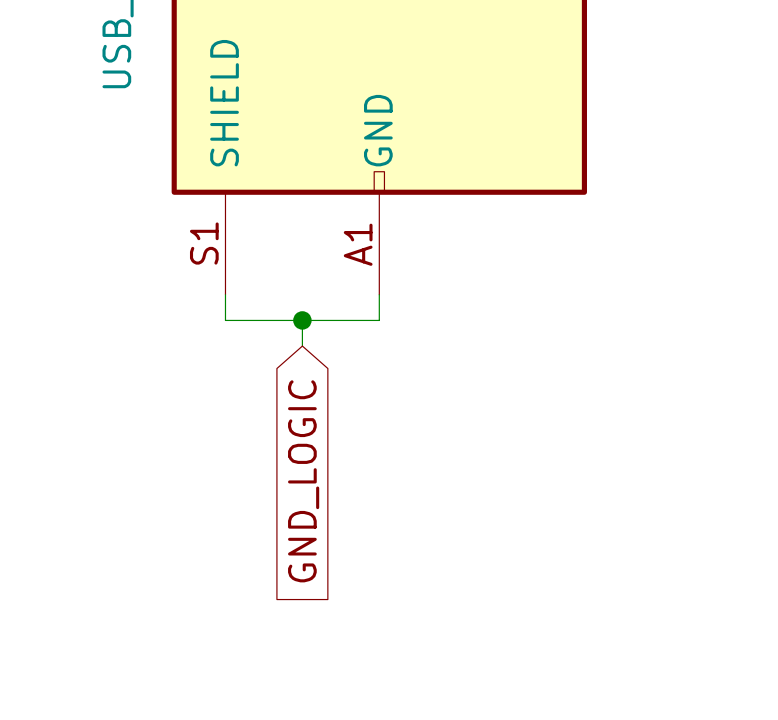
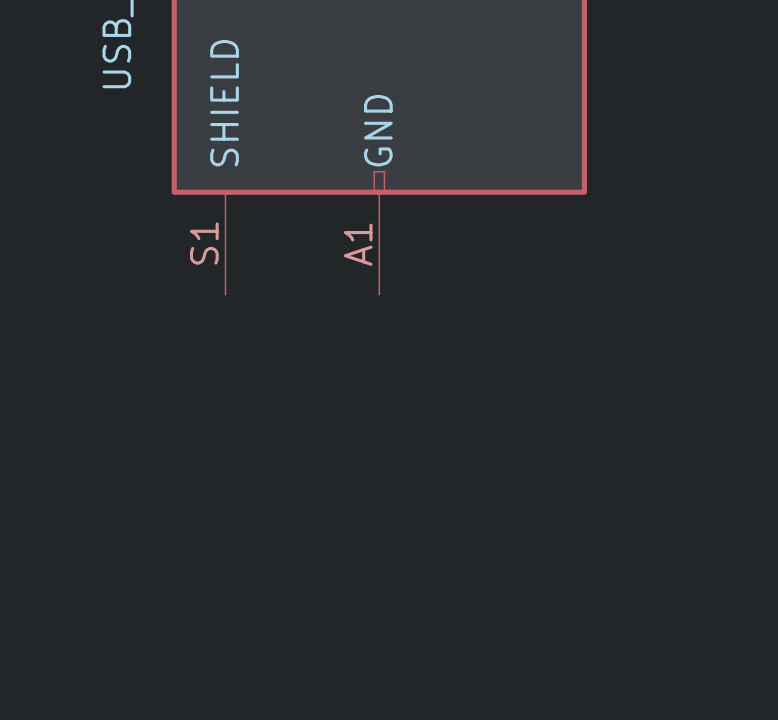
wire: (225, 294) (225, 320) (379, 320) (379, 294) -> none
wire: (302, 320) (302, 346) -> none
junction: (302, 320) -> none
global label: GND_LOGIC (303, 481) -> none

